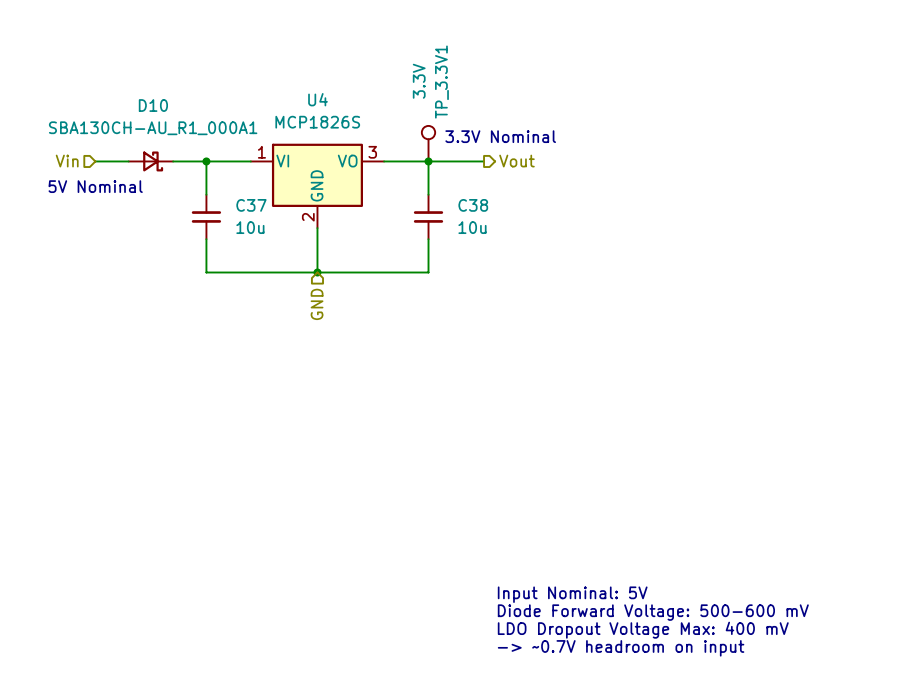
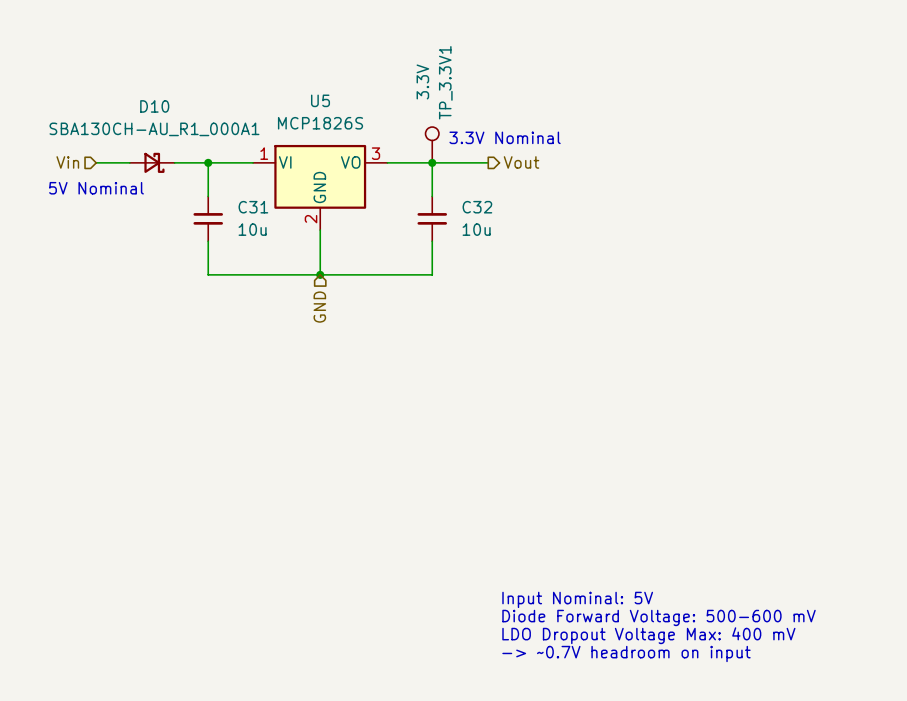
U4 name: U4 (318, 99) -> U5 (320, 100)
C37 name: C37 (251, 205) -> C31 (253, 207)
C38 name: C38 (473, 205) -> C32 (477, 207)

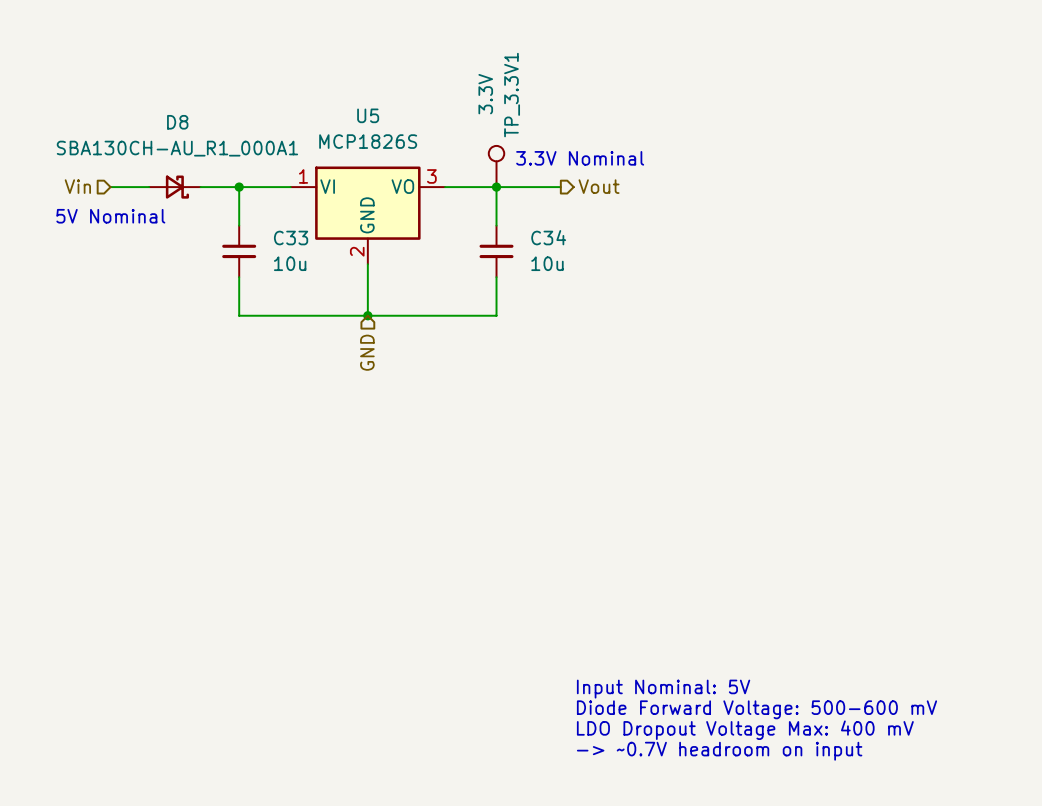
D10 name: D10 (154, 106) -> D8 (177, 122)
C31 name: C31 (253, 207) -> C33 (291, 238)
C32 name: C32 (477, 207) -> C34 (548, 237)

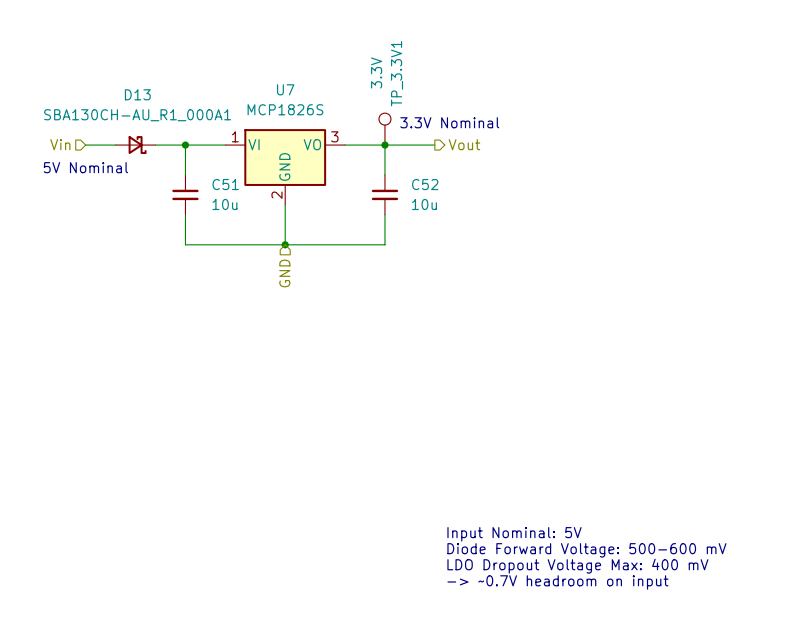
U5 name: U5 (368, 115) -> U7 (285, 89)
D8 name: D8 (177, 122) -> D13 (137, 94)
C34 name: C34 (548, 237) -> C52 (425, 184)
C33 name: C33 (291, 238) -> C51 (225, 184)

